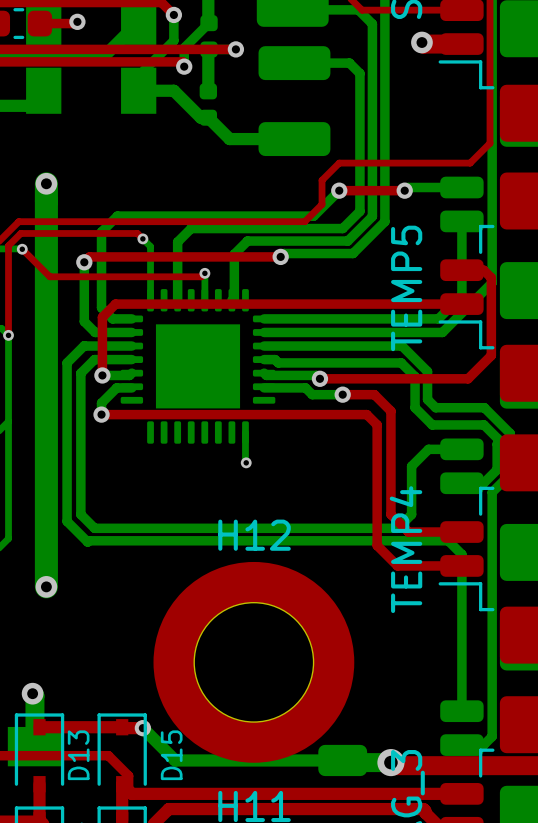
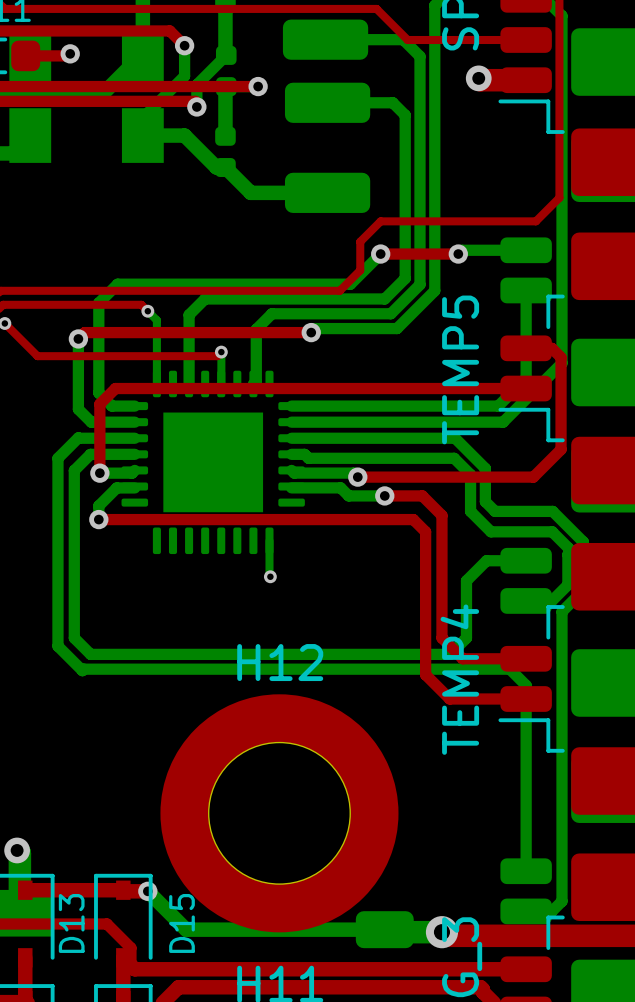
bottom track: (46, 183) (46, 586) -> none
via: (46, 183) -> none
via: (46, 586) -> none

